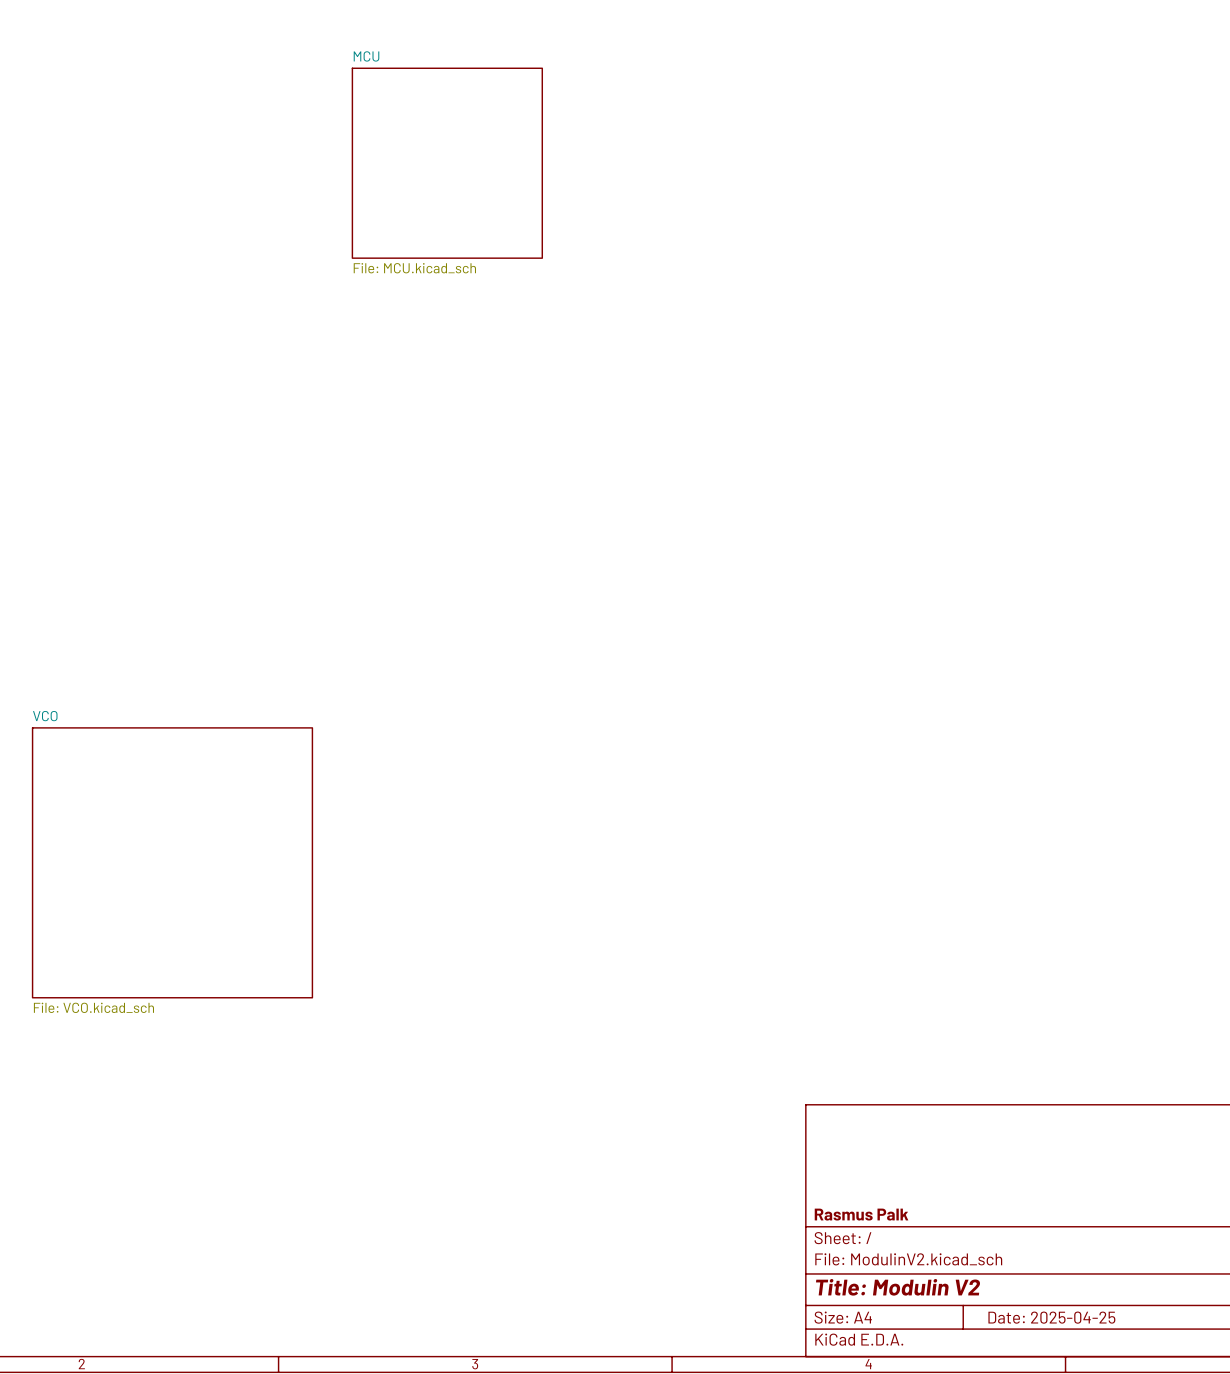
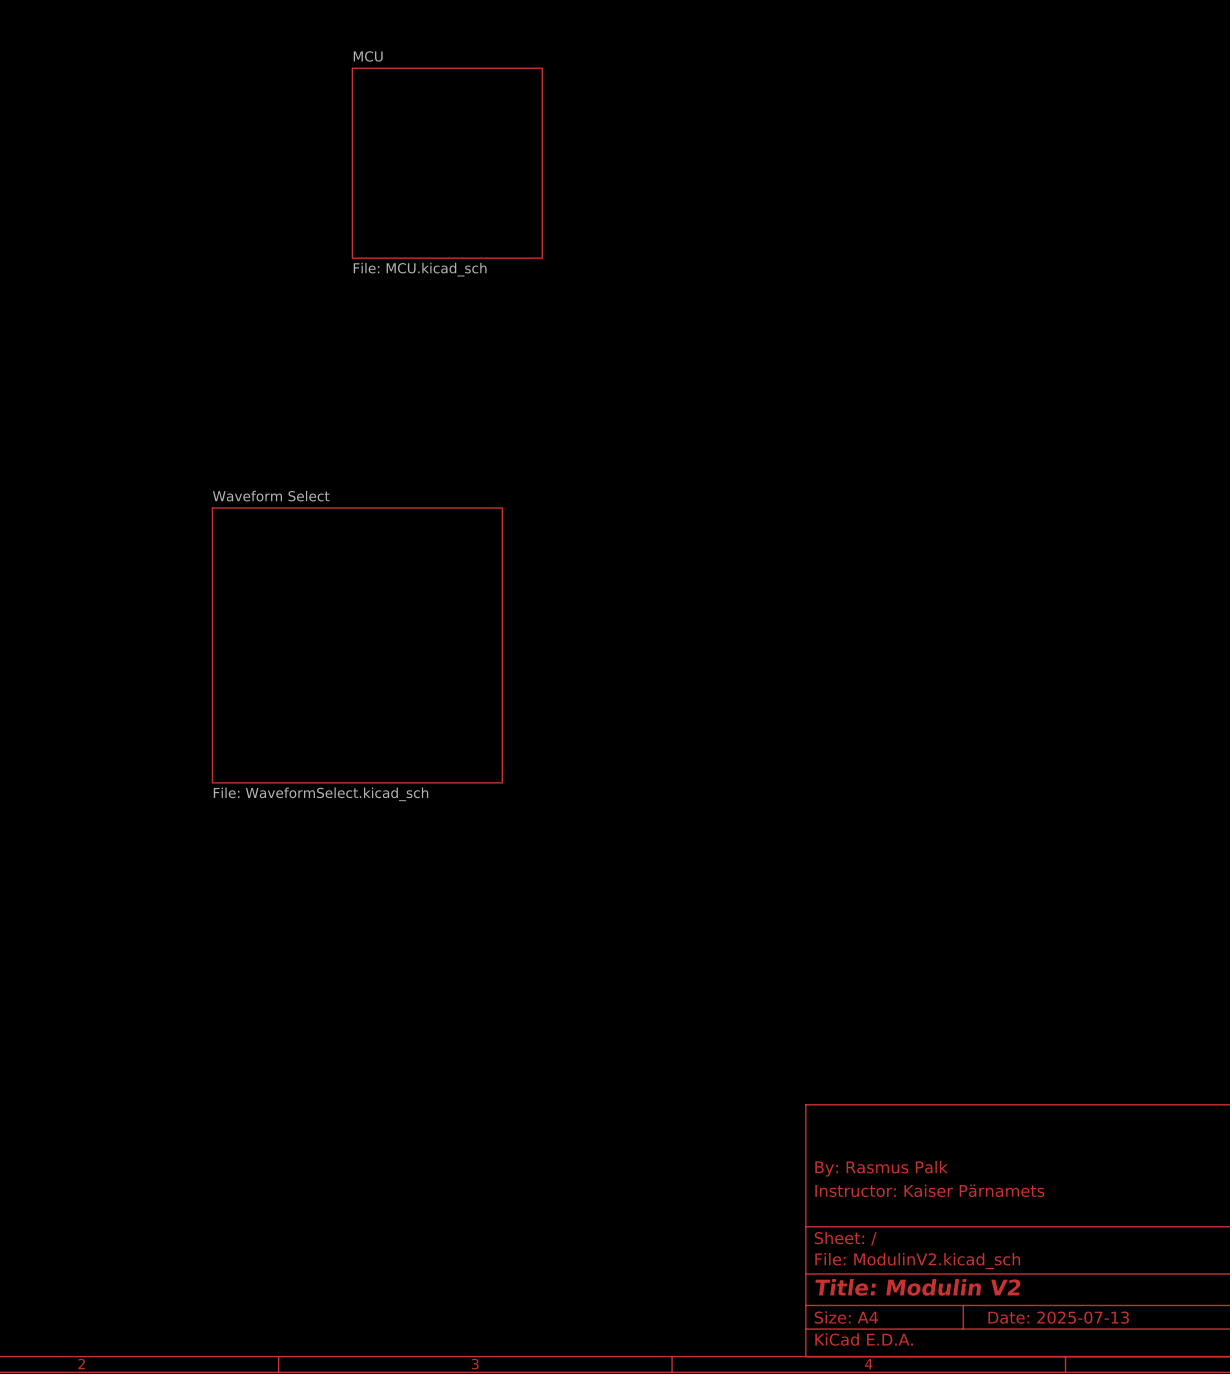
sheet Waveform Select: none -> File: WaveformSelect.kicad_sch (357, 645)
sheet VCO: File: VCO.kicad_sch (172, 862) -> none
title block: none -> By: Rasmus Palk (881, 1168)
title block: none -> Instructor: Kaiser Pärnamets (929, 1190)
title block: Rasmus Palk (861, 1214) -> none
title block: Date: 2025-04-25 (1051, 1317) -> Date: 2025-07-13 (1058, 1317)

